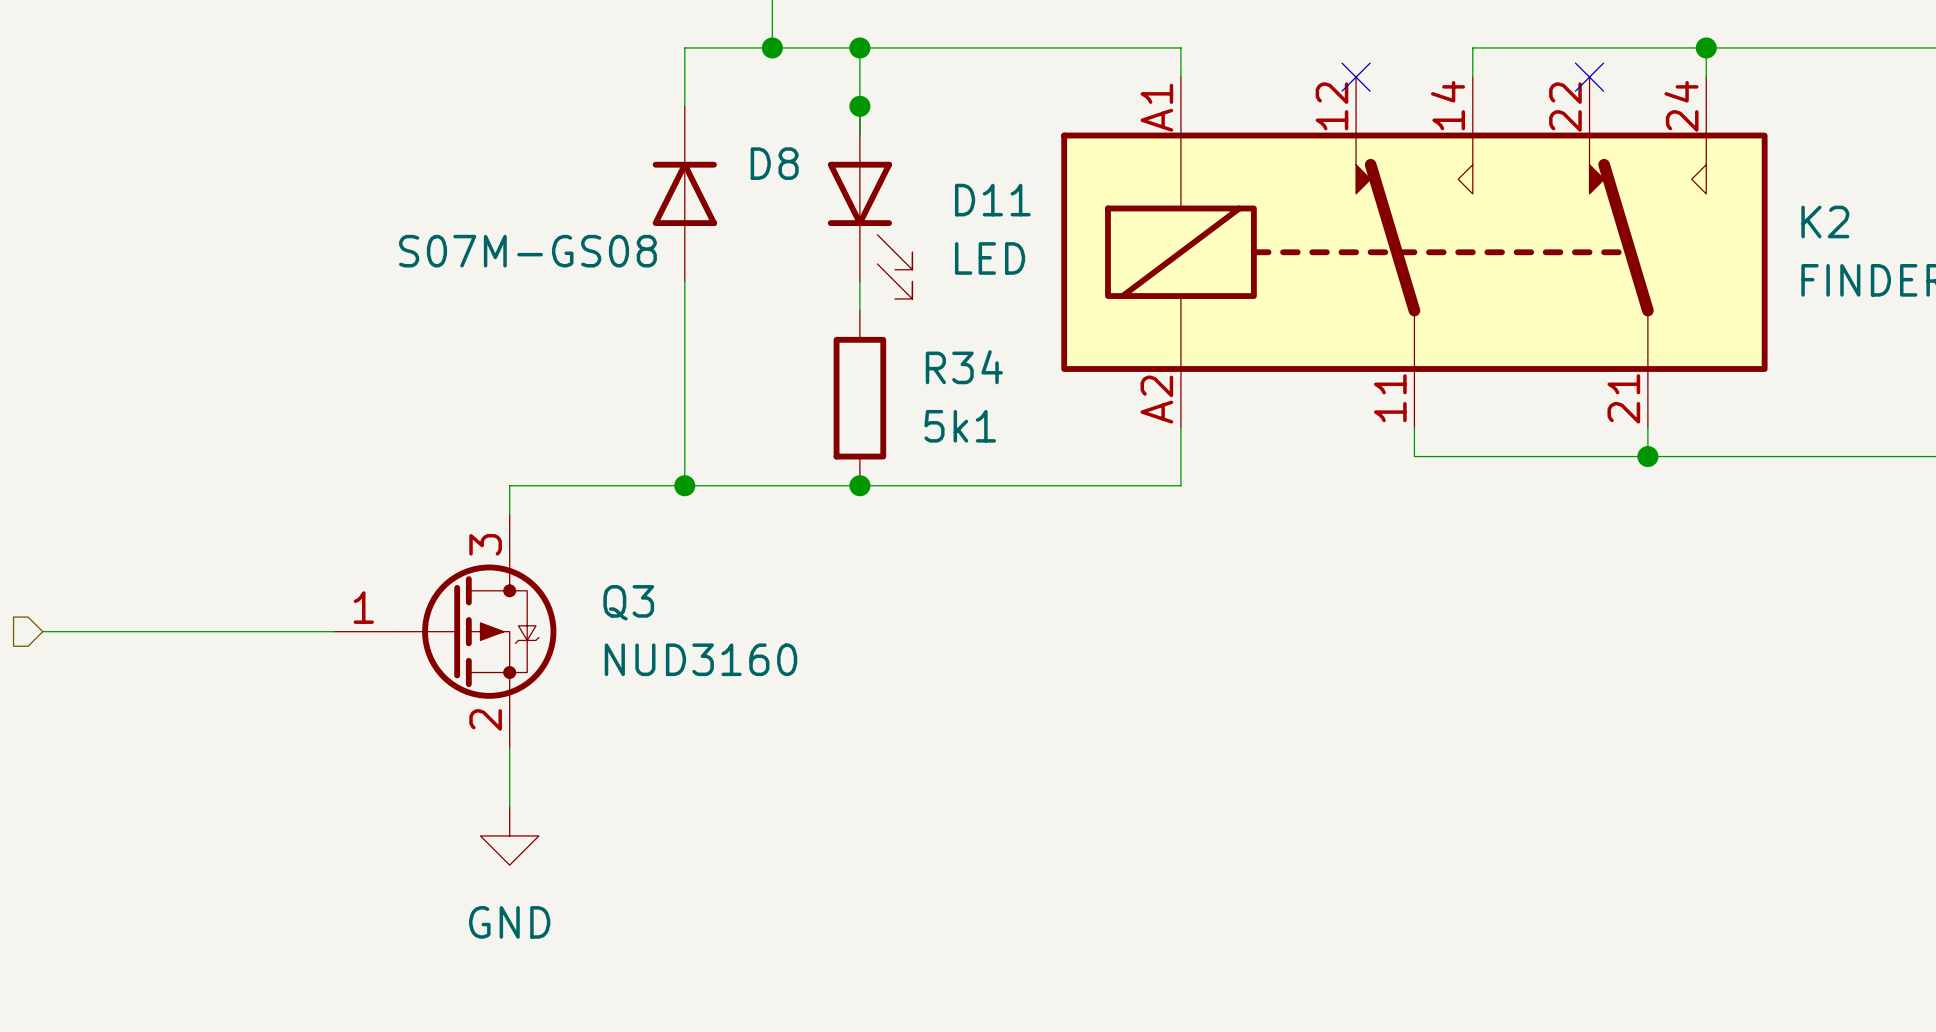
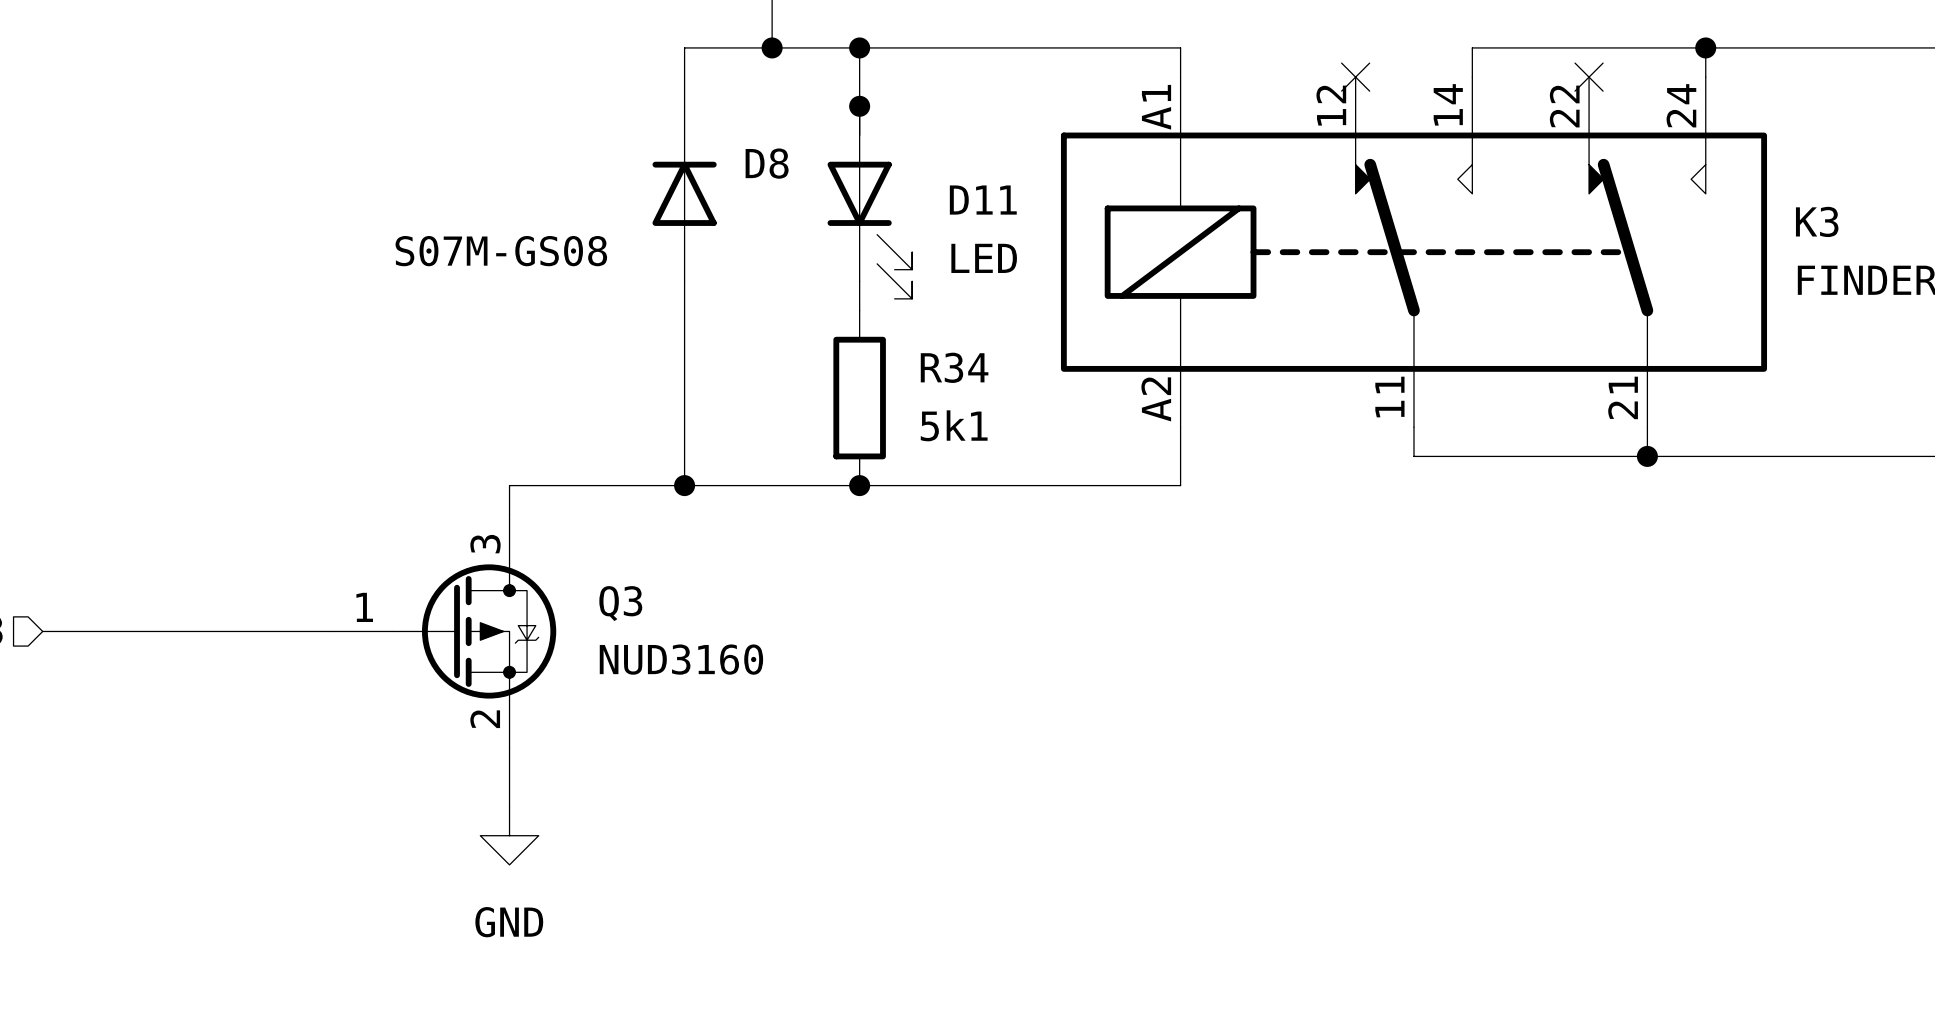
K2 name: K2 (1825, 221) -> K3 (1817, 221)

